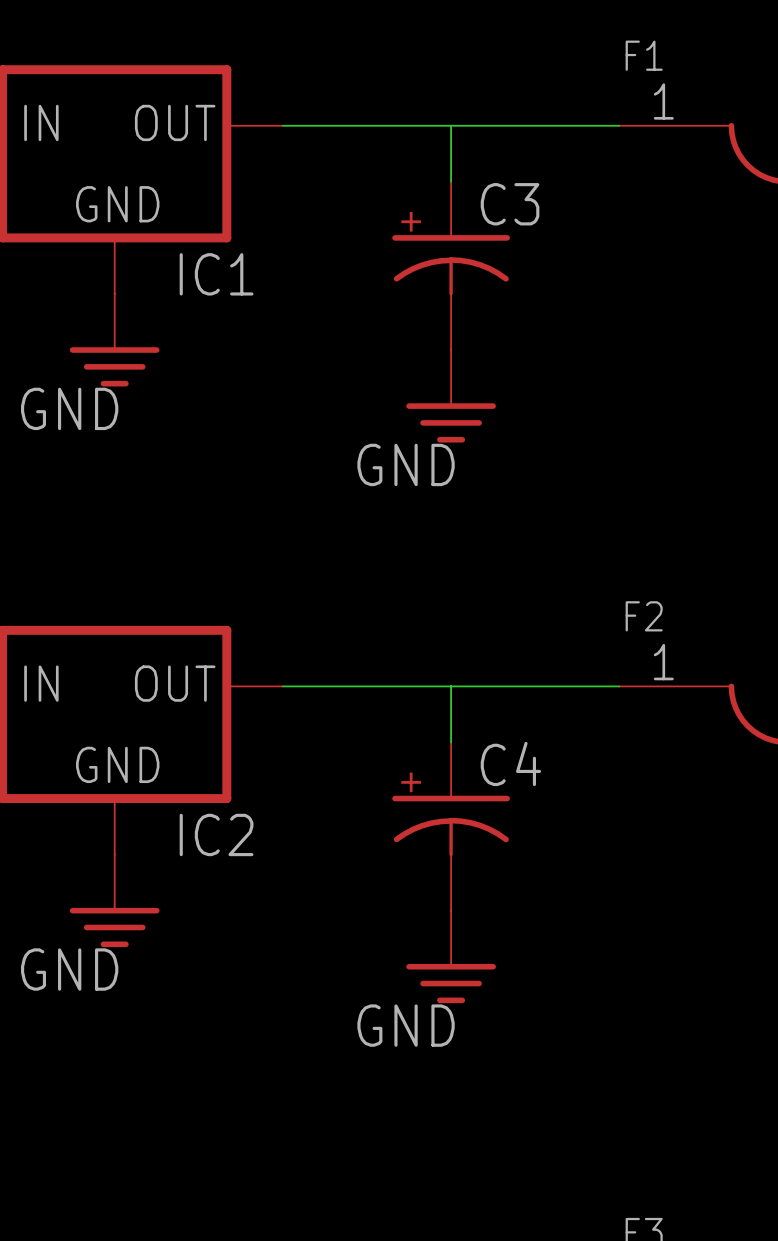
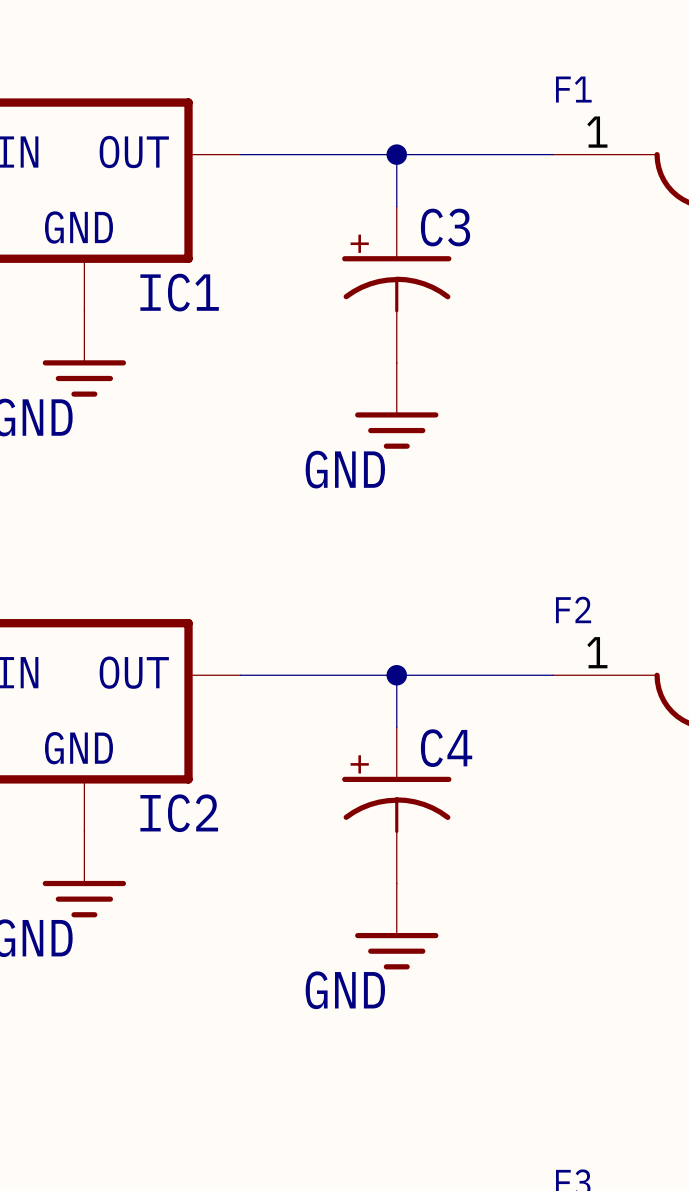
junction: none -> (396, 154)
junction: none -> (396, 675)

